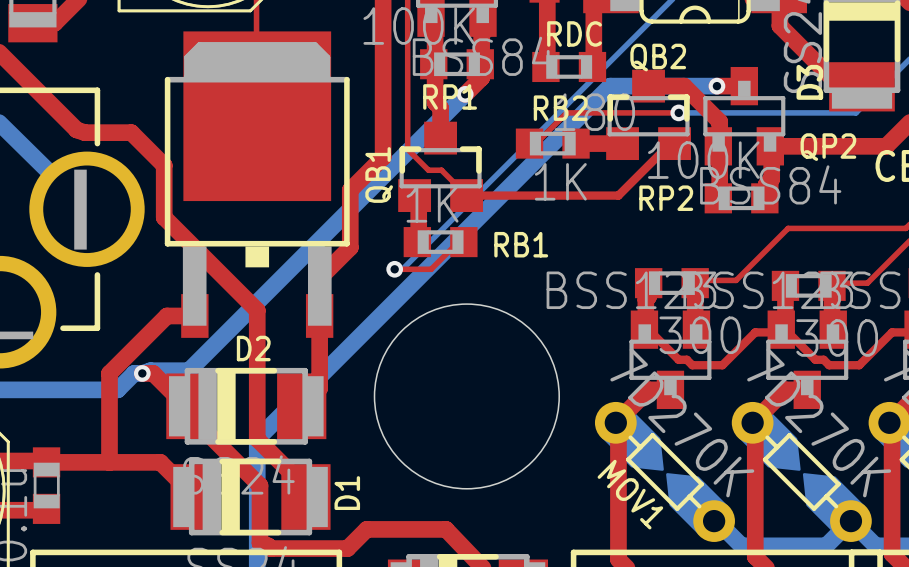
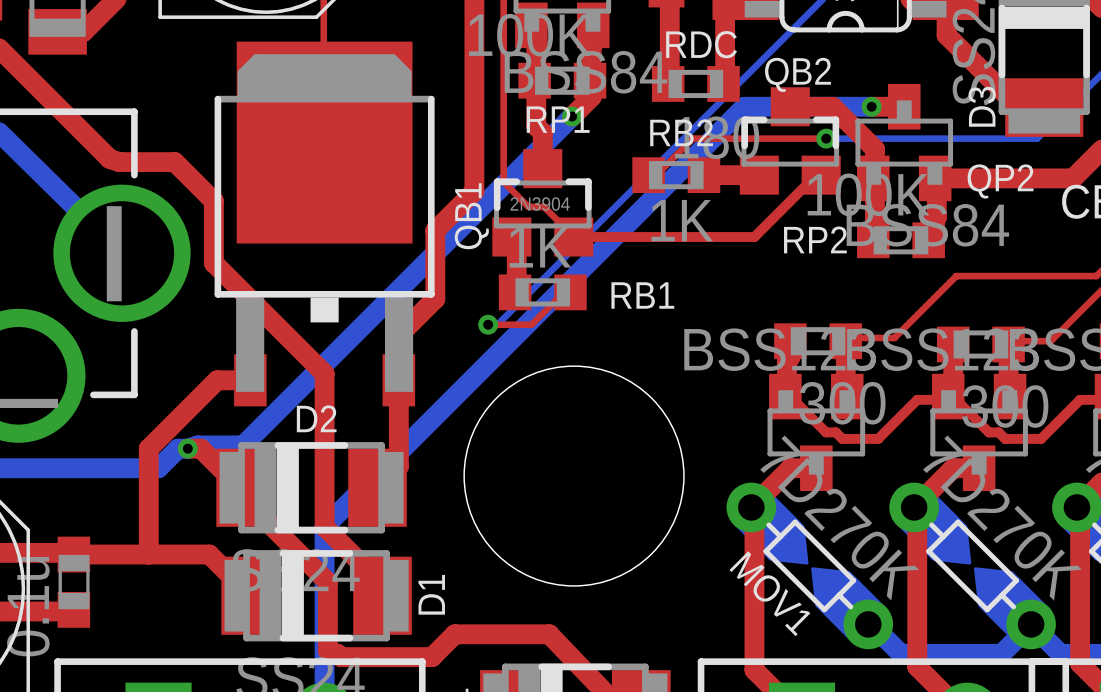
QB1 value: none -> 2N3904 (540, 204)

